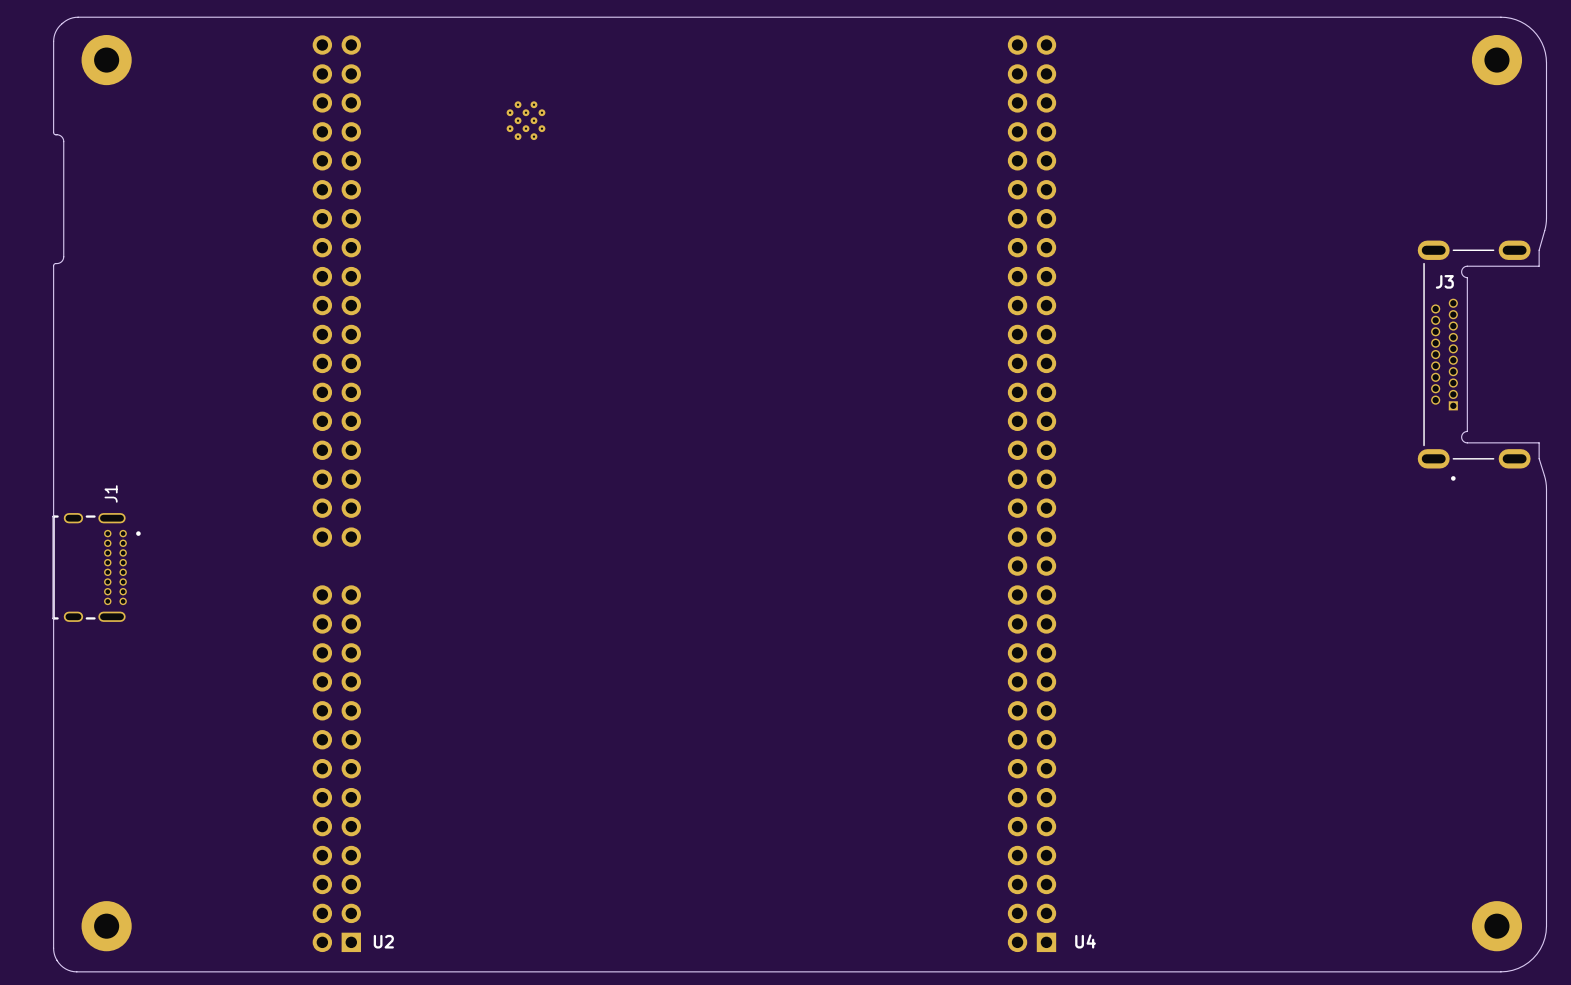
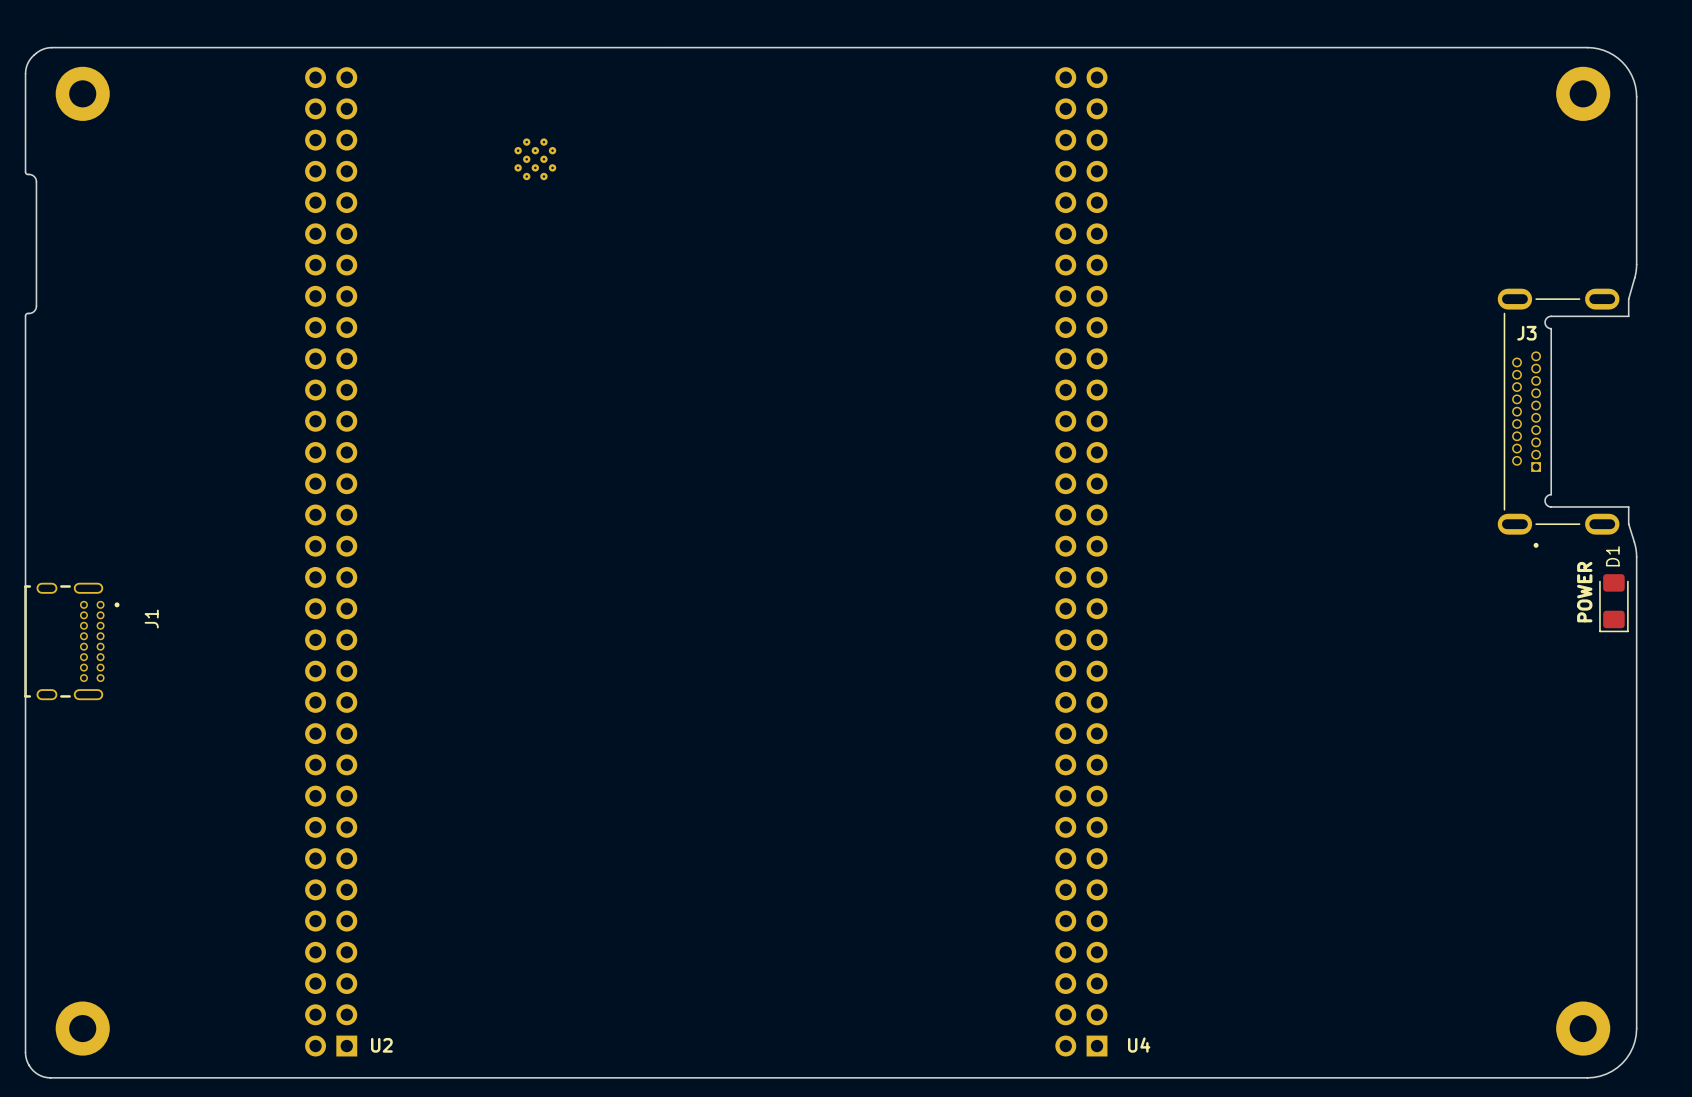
U2 footprint: [312, 35, 361, 953] -> [305, 67, 358, 1057]
J1 name position: J1 (111, 493) -> J1 (151, 619)
text: none -> POWER (1584, 592)
D1: none -> (1613, 603)

